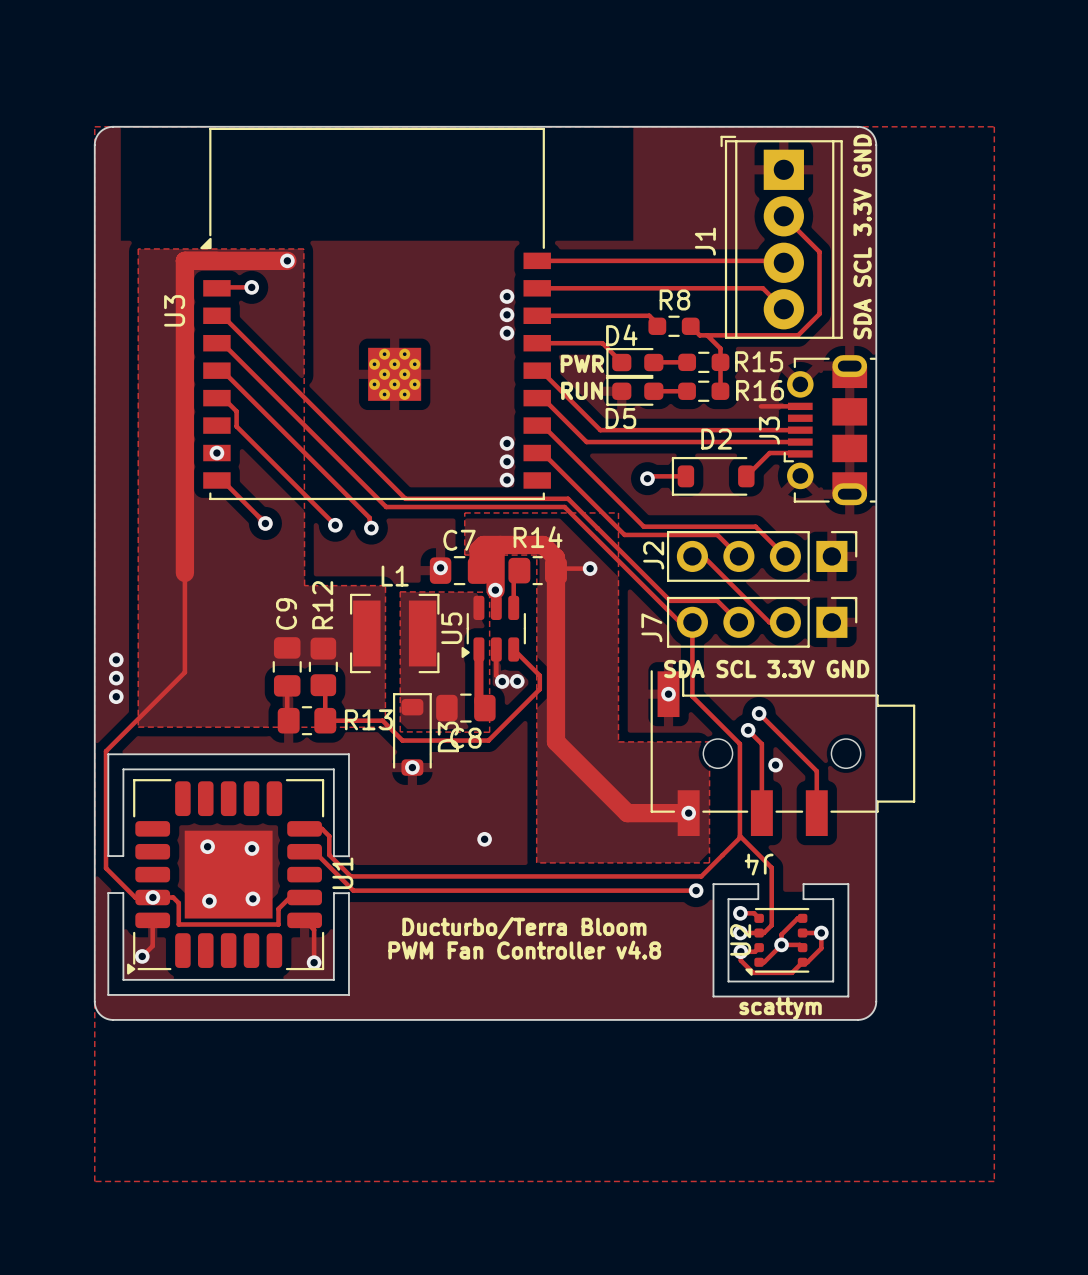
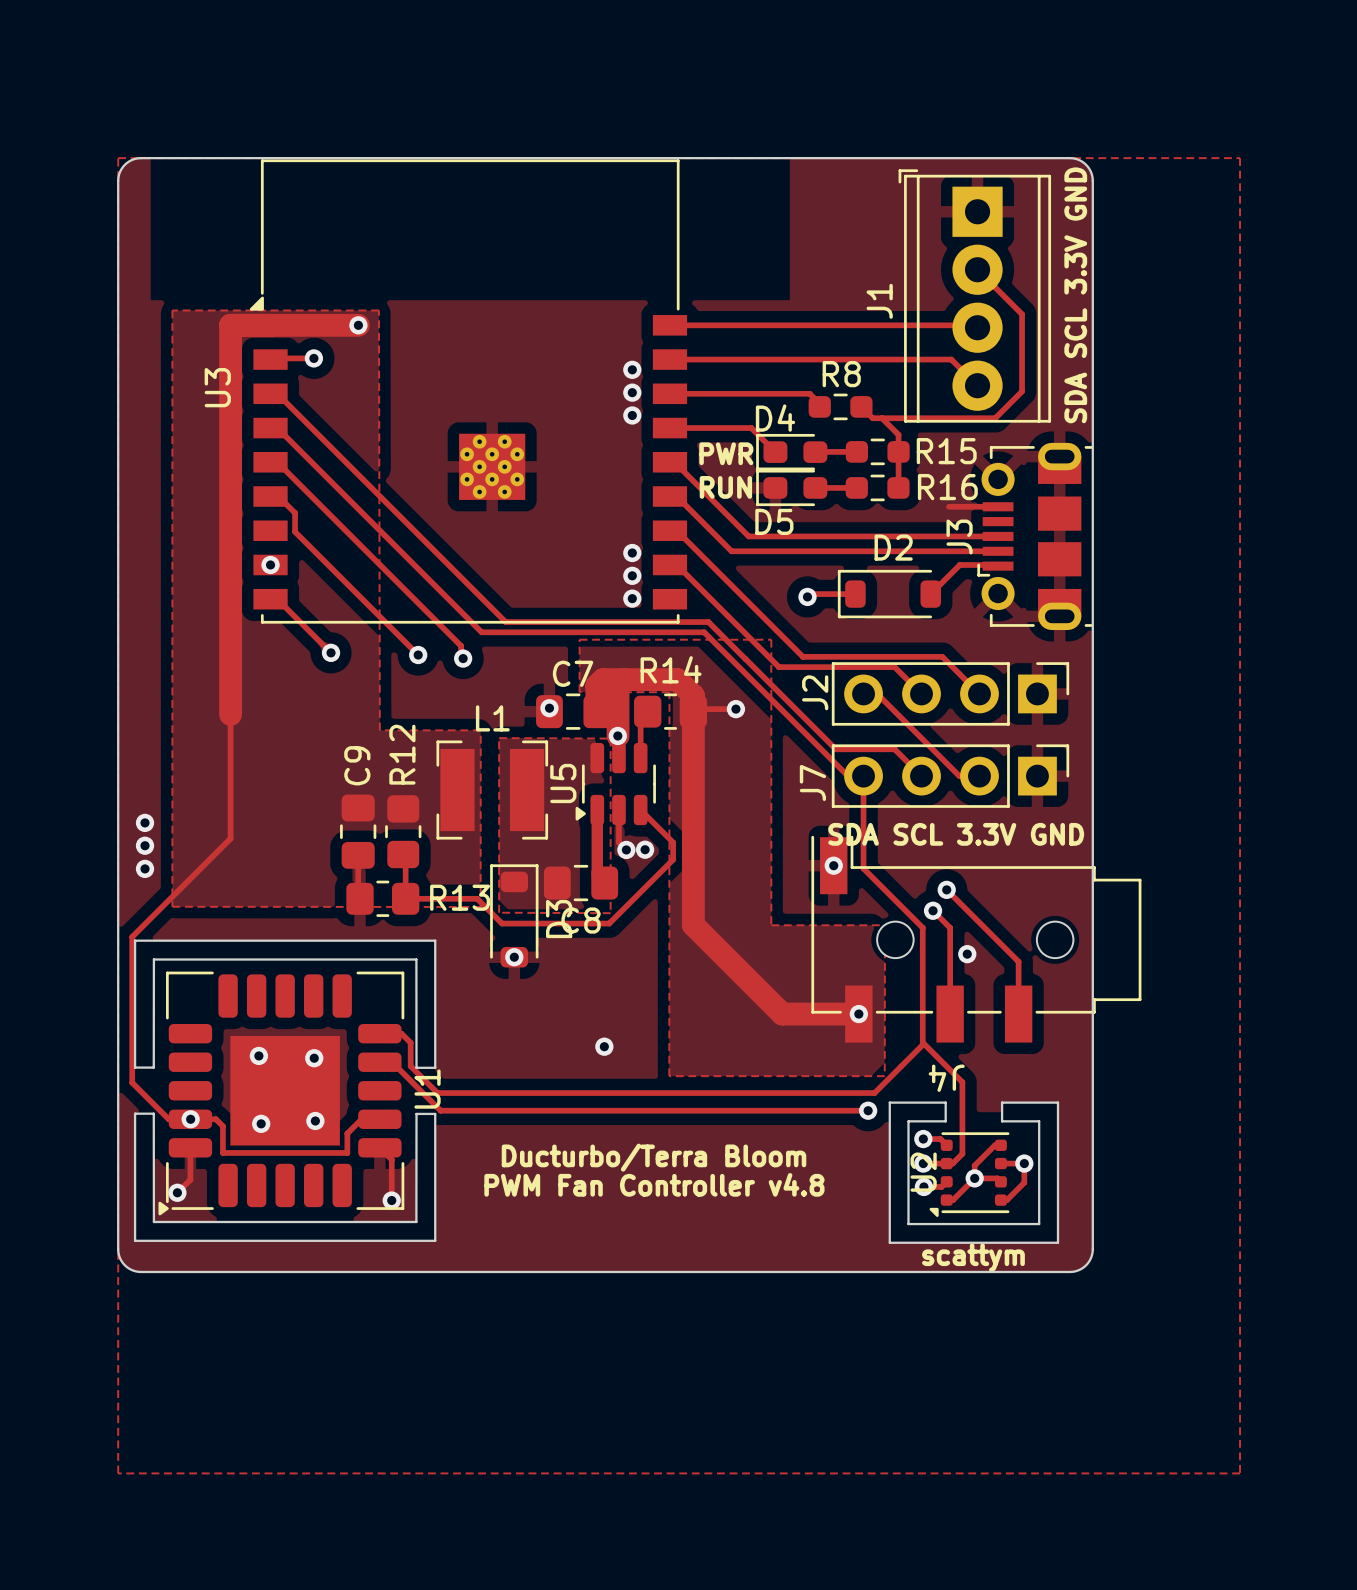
track: (740, 951) (740, 960) (753, 972) (792, 972) (802, 962) -> none

